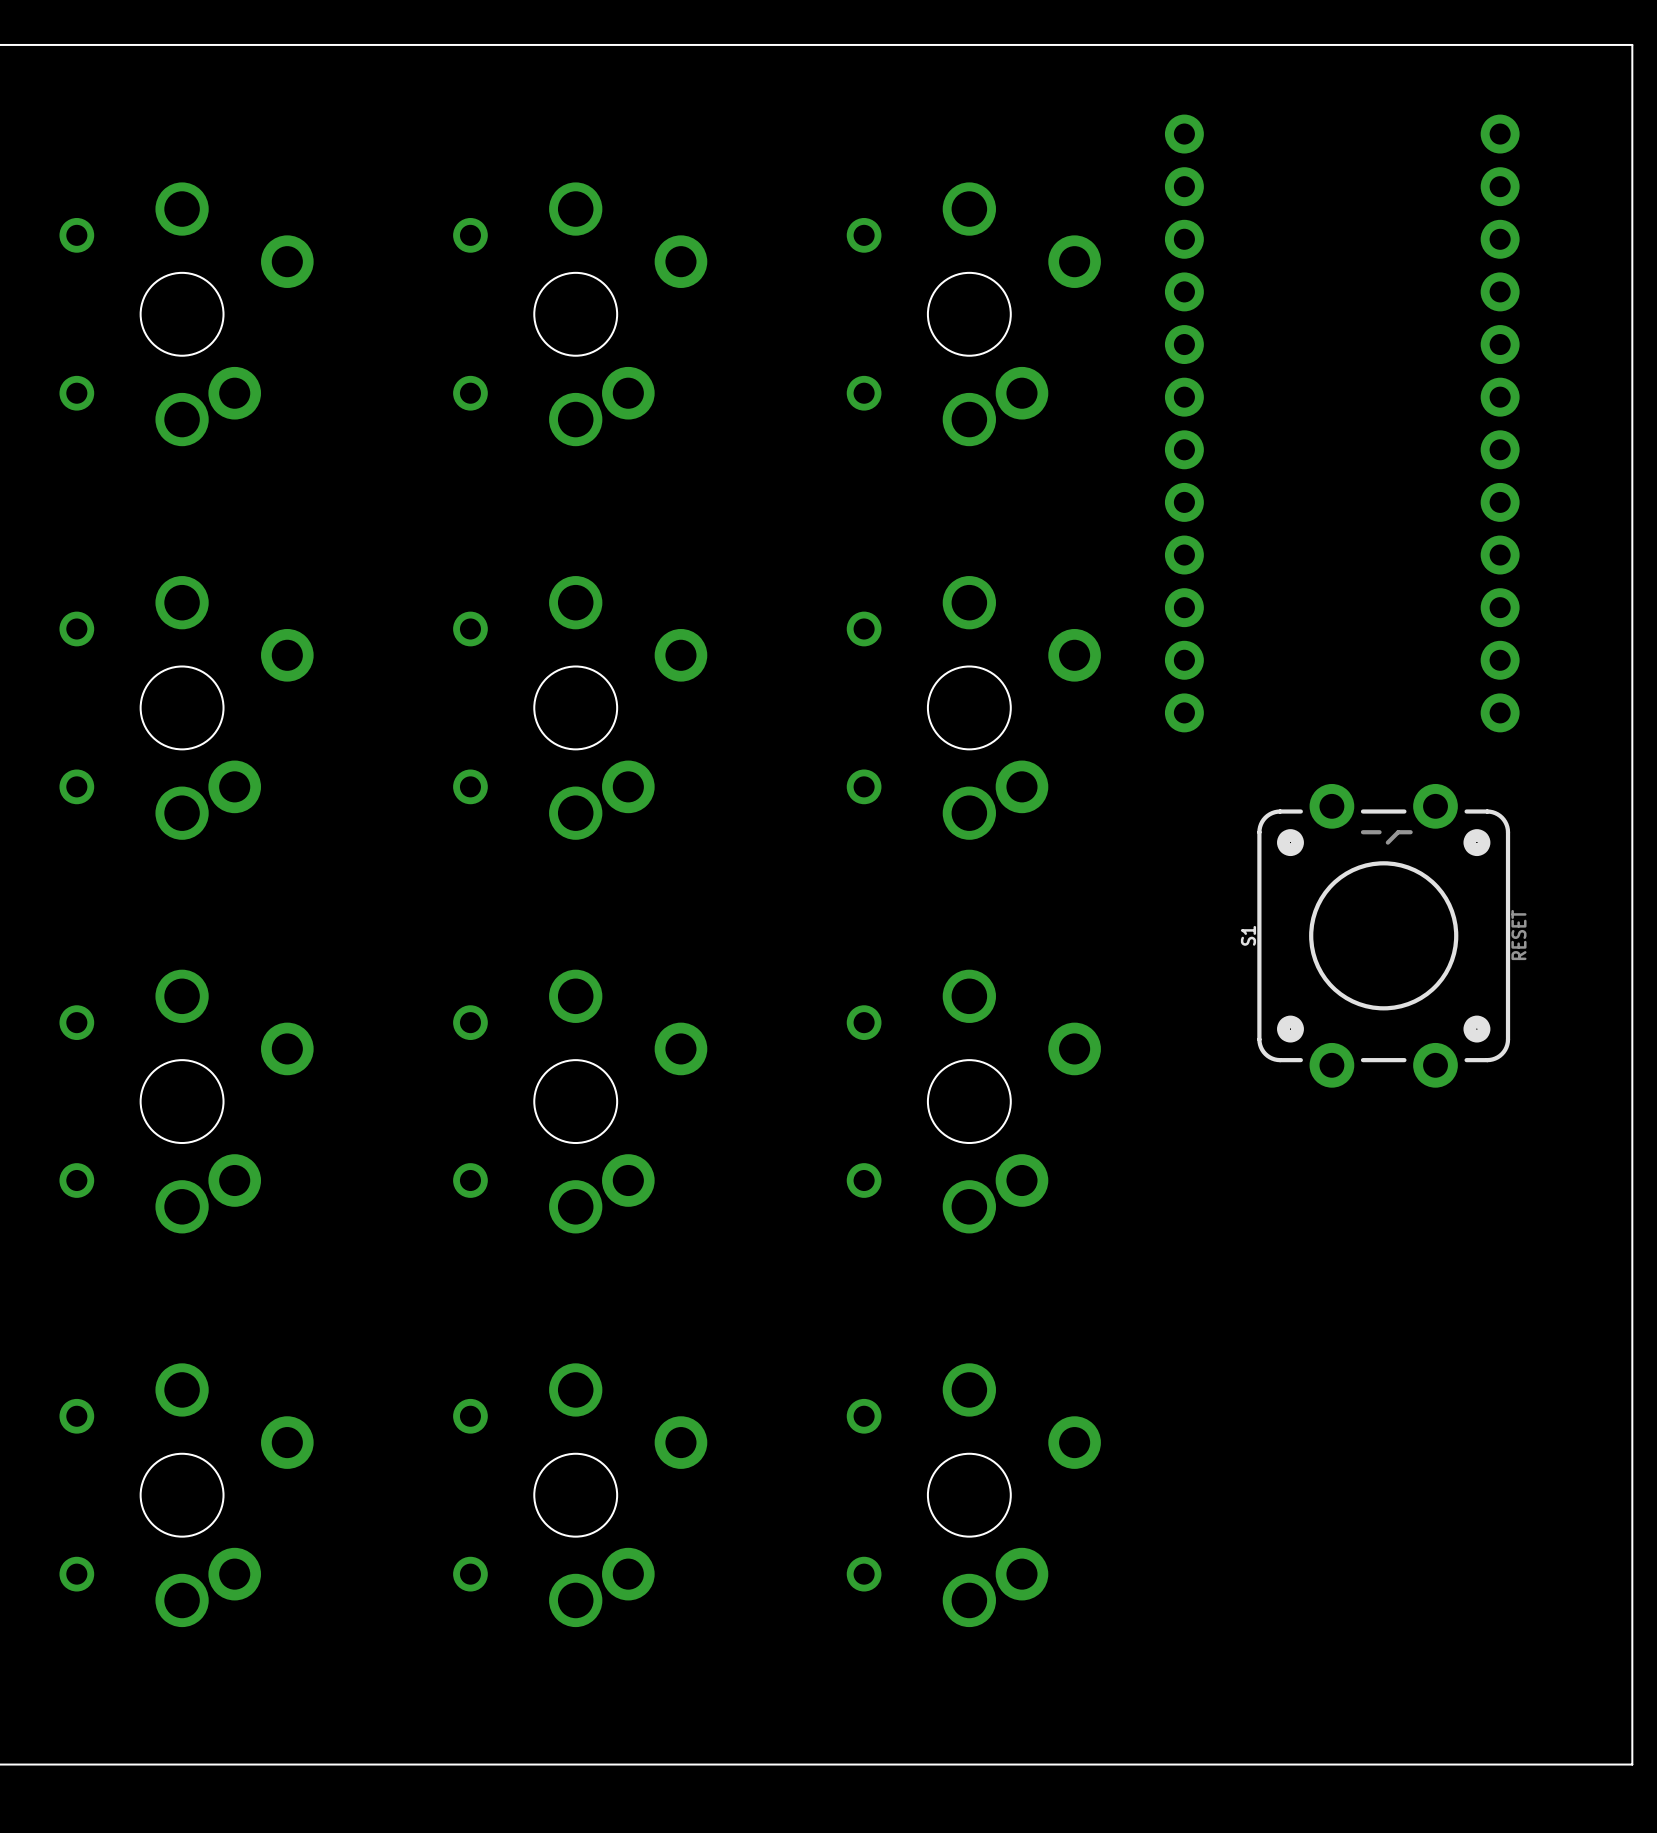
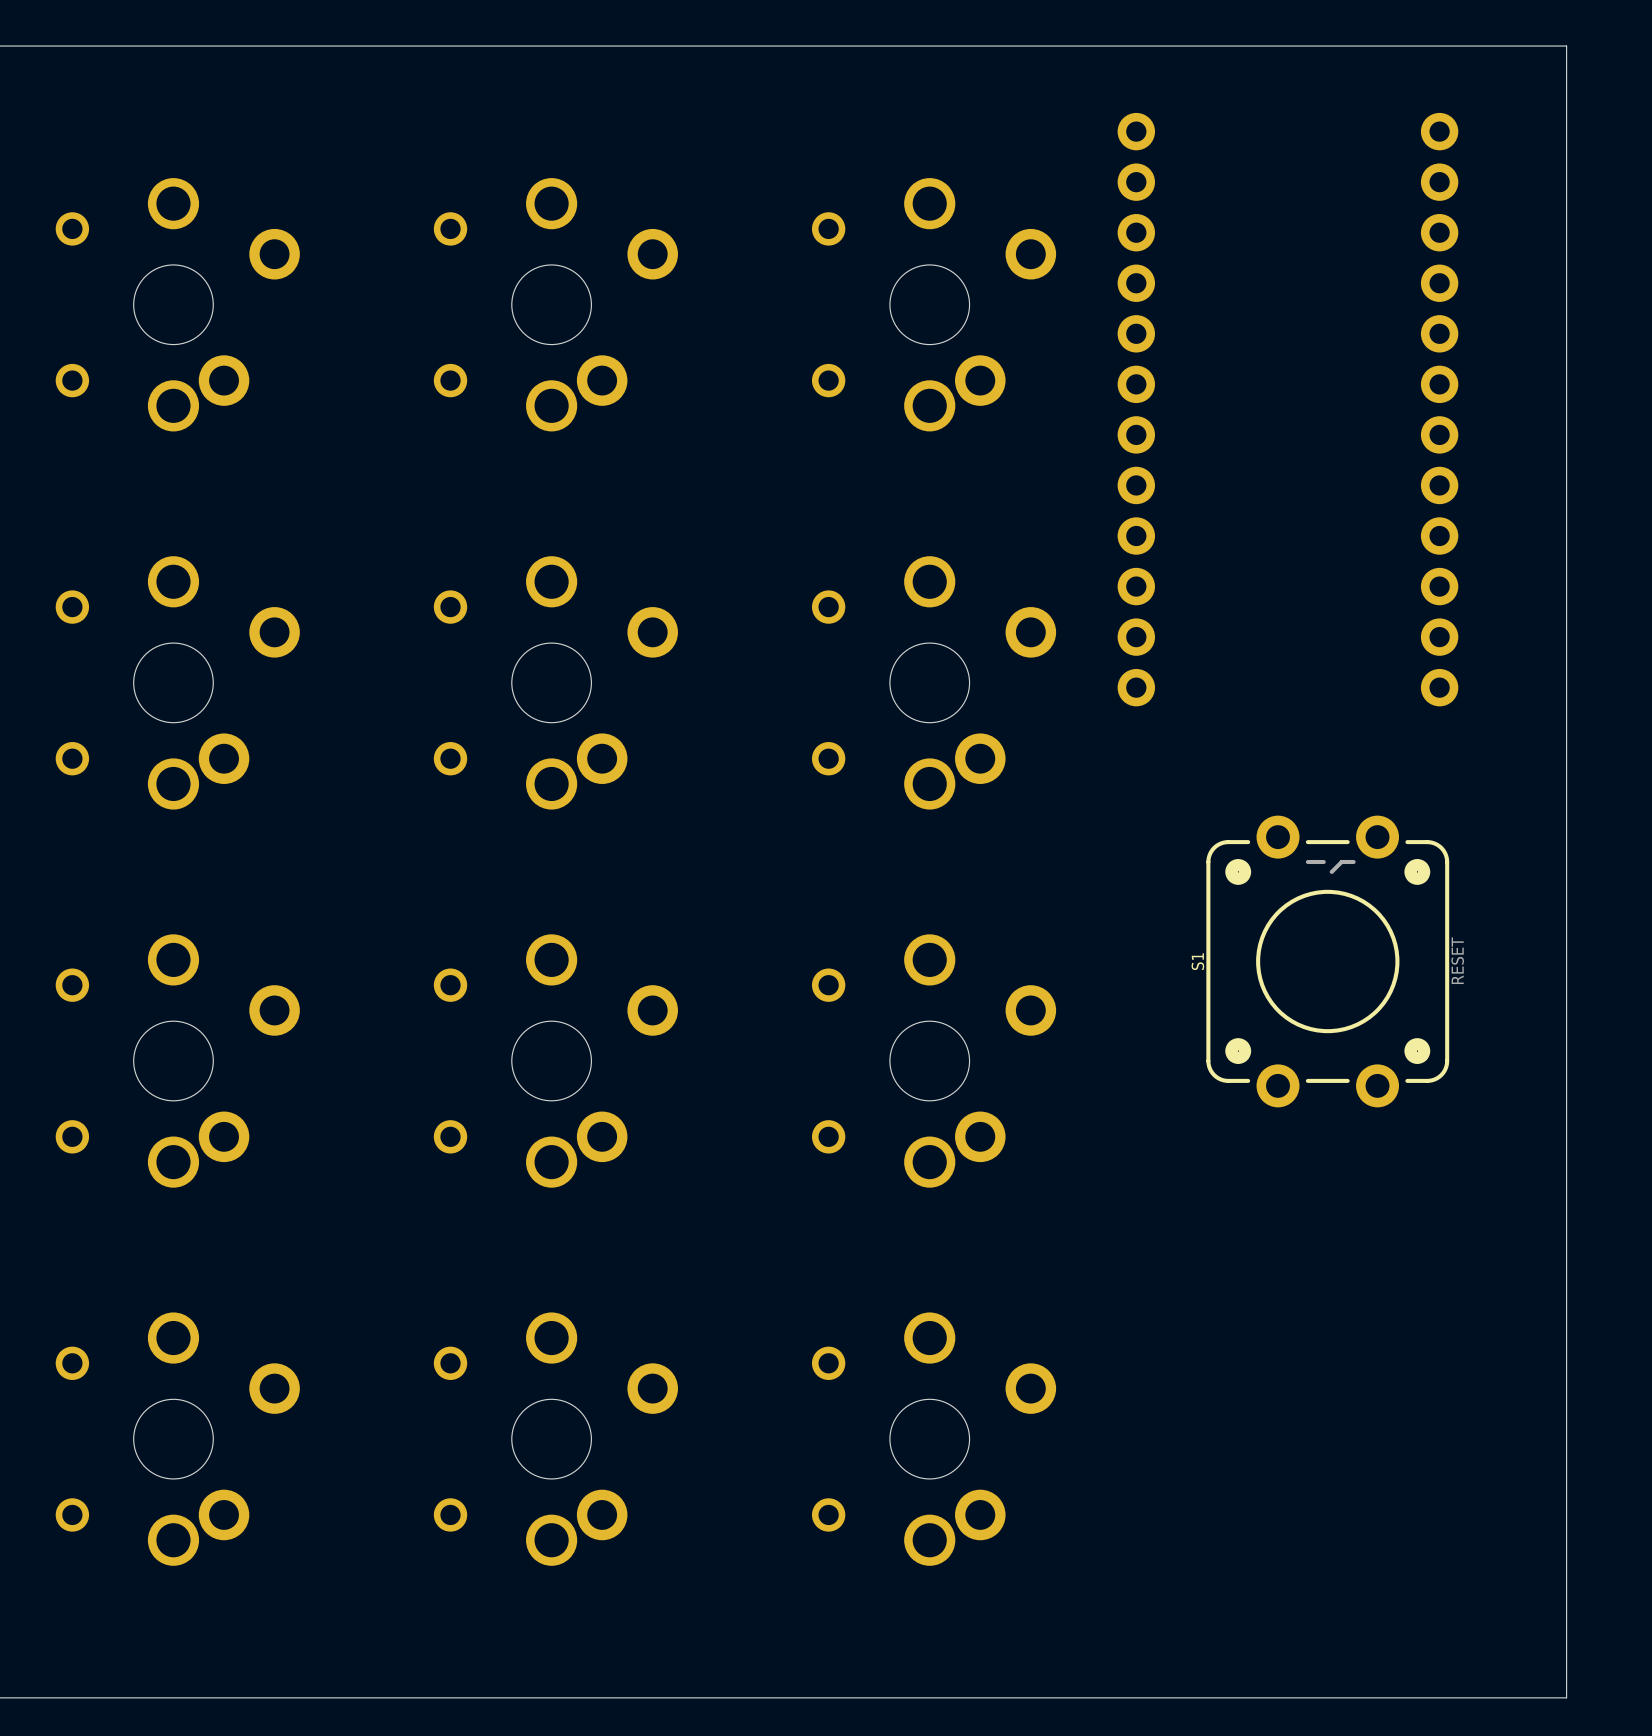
S1 position: (1383, 935) -> (1327, 961)

